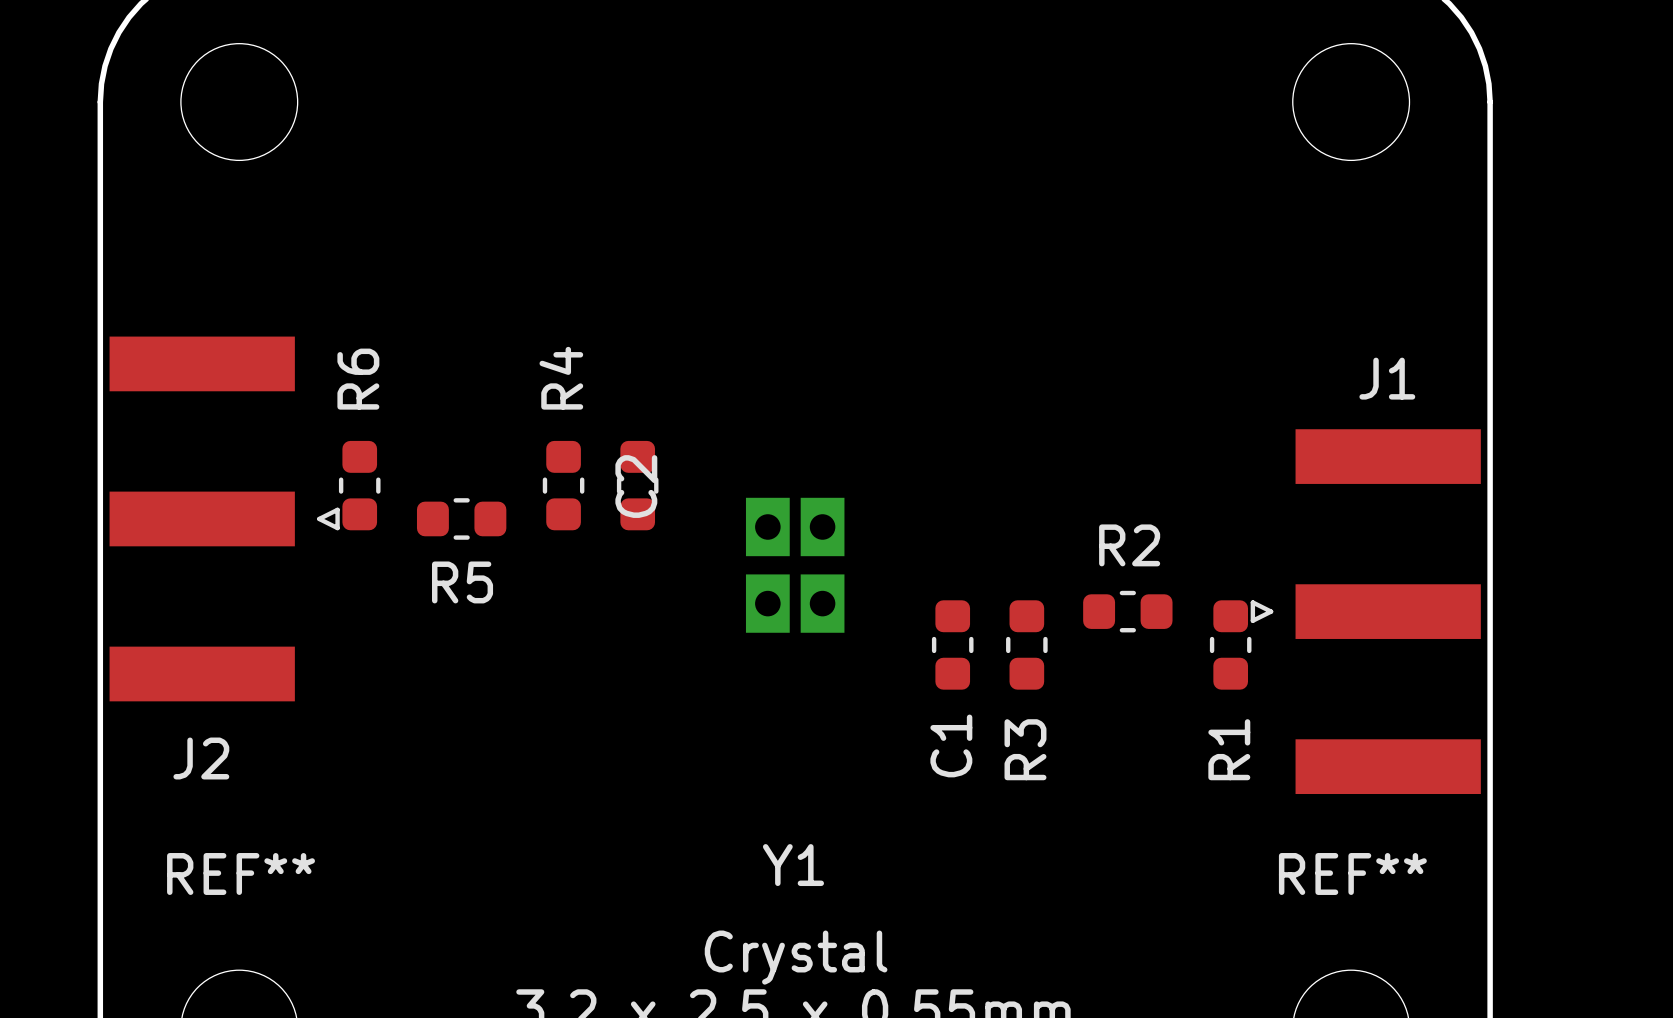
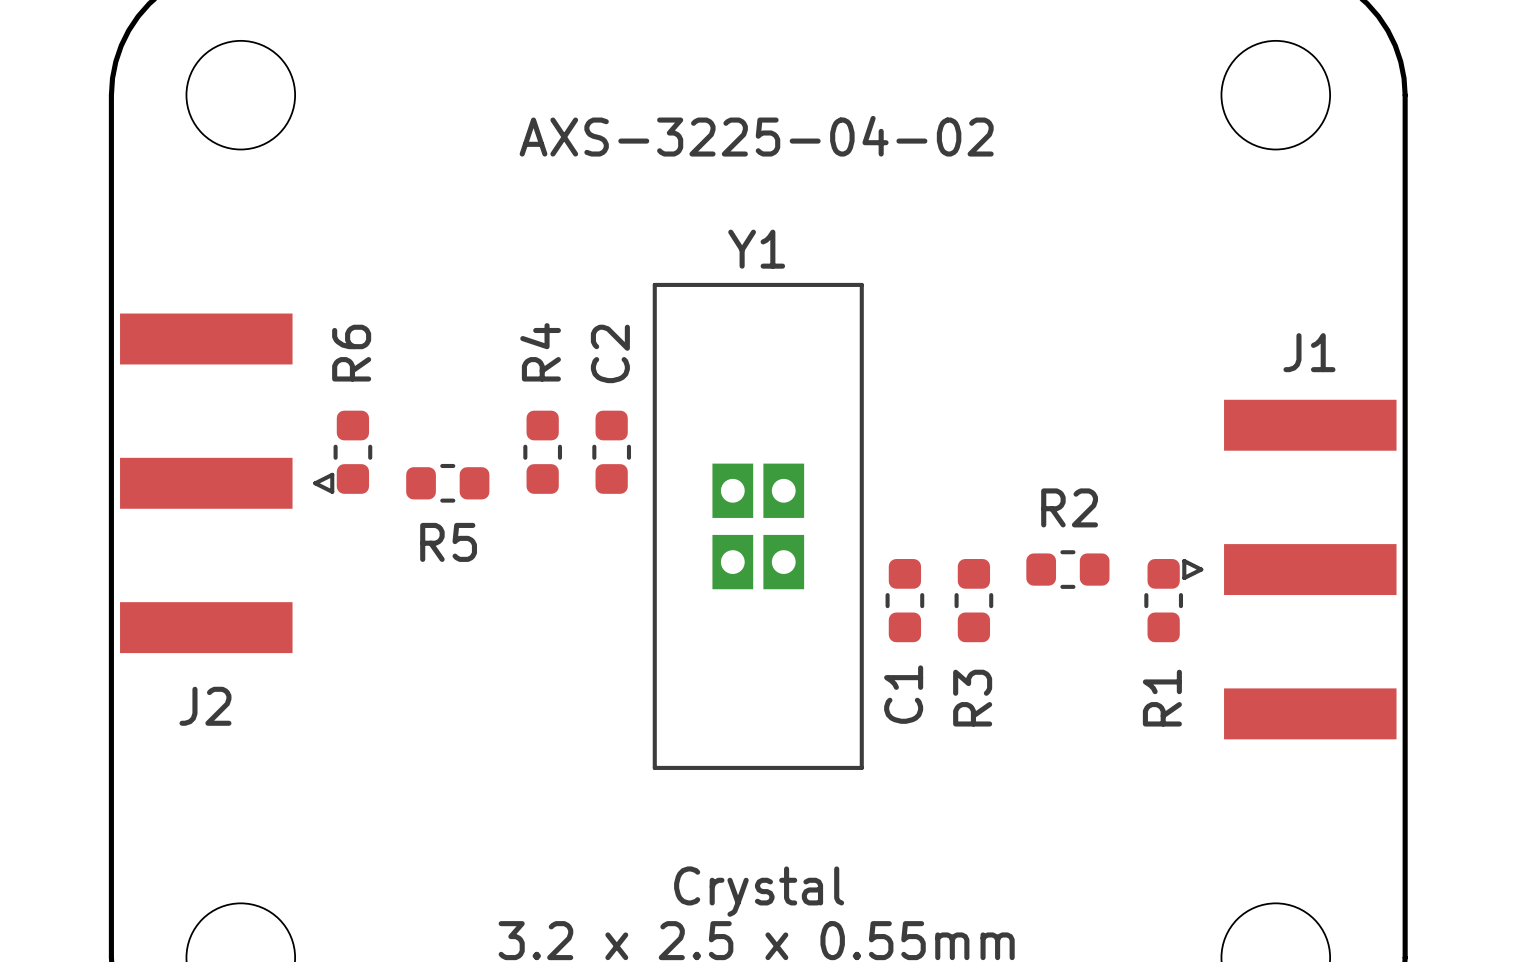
Y1 value: none -> AXS-3225-04-02 (756, 136)
line: none -> (654, 284) (654, 767) (861, 767) (861, 284) (654, 284)
C2 name position: C2 (636, 486) -> C2 (610, 353)
Y1 name position: Y1 (793, 865) -> Y1 (756, 249)
REF** name: REF** (241, 873) -> none
REF** name: REF** (1352, 873) -> none

